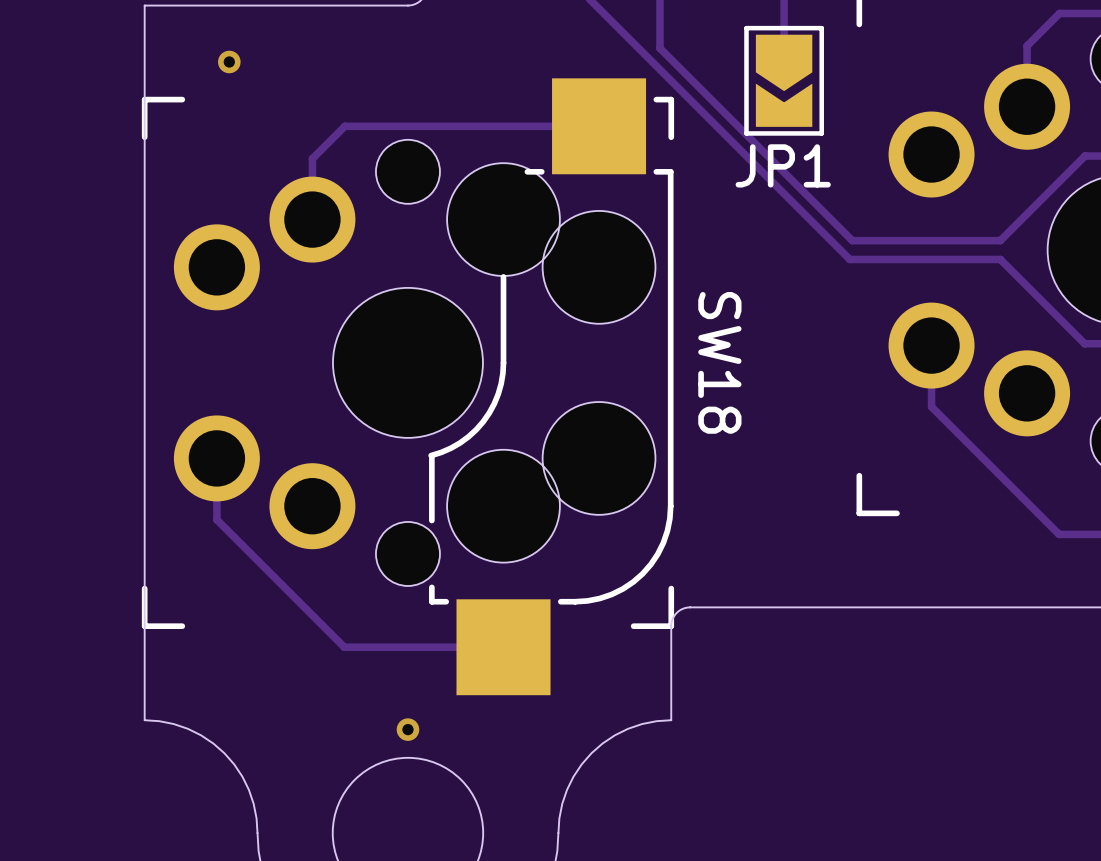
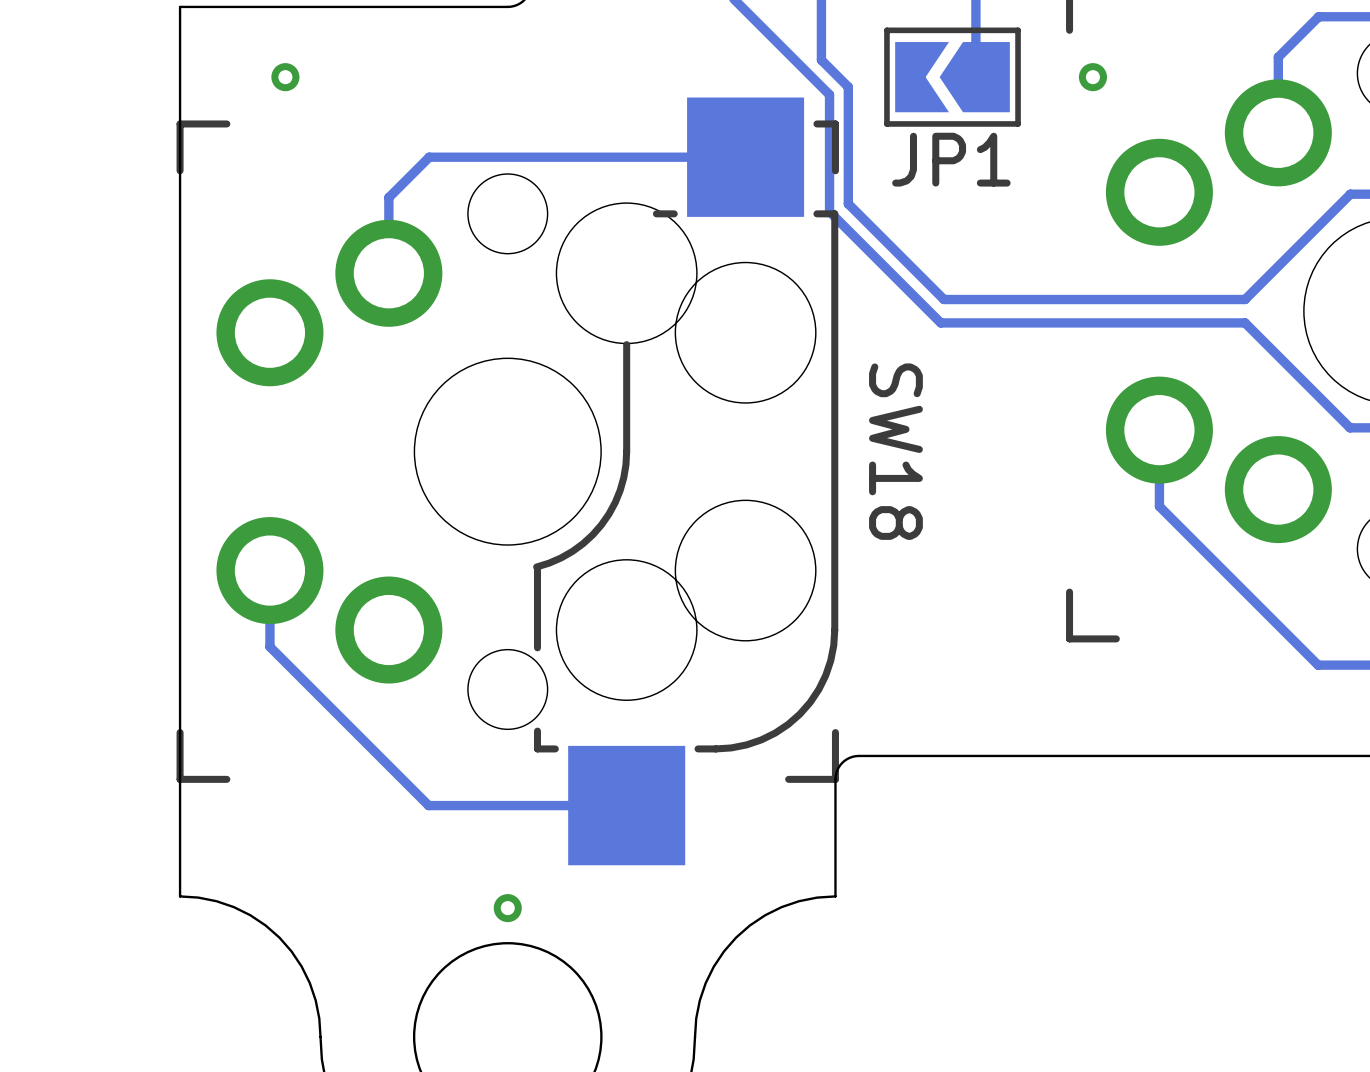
via: none -> (1092, 77)
track: (681, 69) (852, 240) -> (848, 87) (848, 203) (943, 299) (1060, 299)
track: (666, 76) (849, 259) -> (829, 94) (829, 211) (940, 322) (1057, 322)
JP1 rotation: 0° (784, 80) -> 90° clockwise (952, 77)

